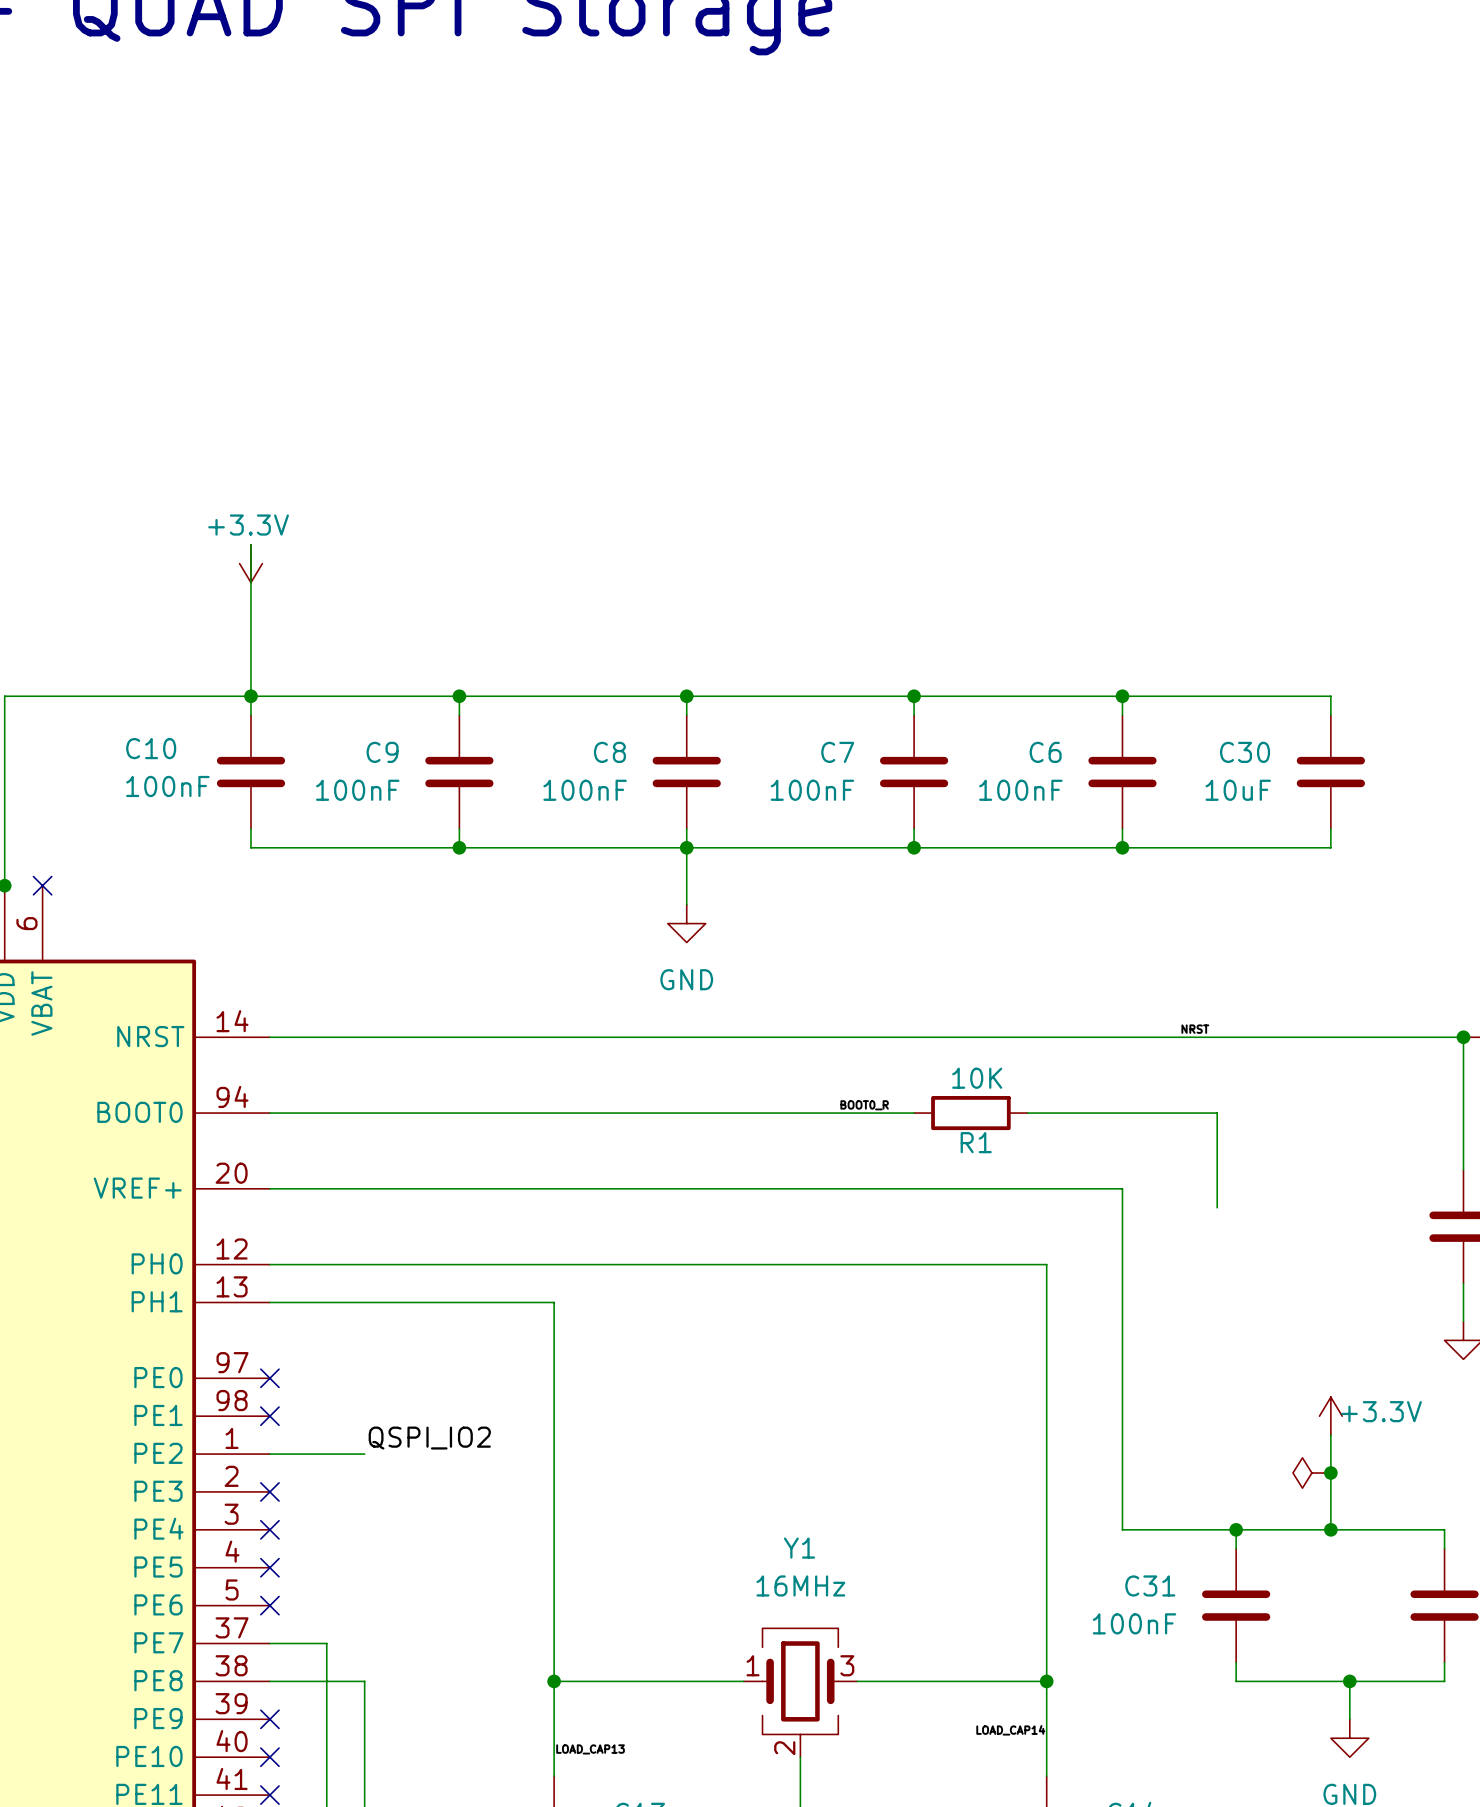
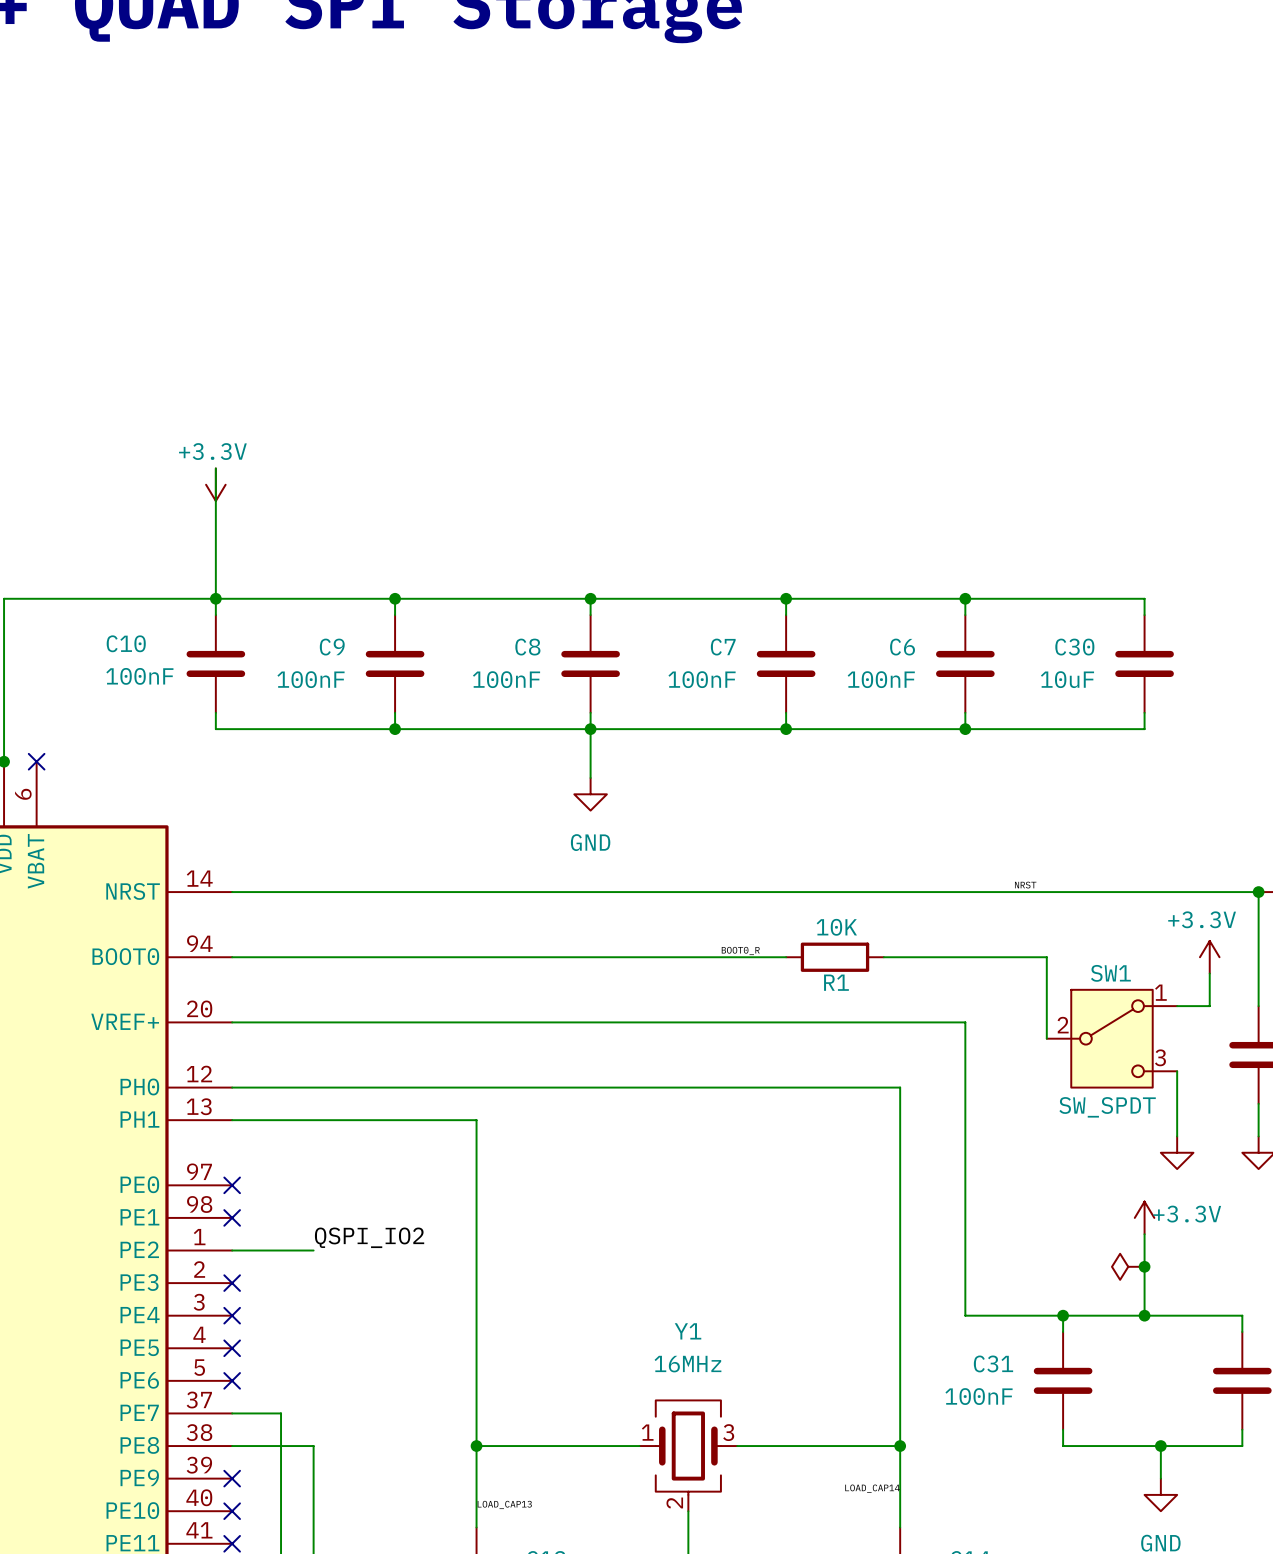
power symbol: none -> +3.3V (1209, 957)
wire: none -> (1209, 973) (1209, 1006) (1177, 1006)
SW1: none -> SW_SPDT (1111, 1038)
wire: none -> (1177, 1071) (1177, 1136)
power symbol: none -> (1177, 1152)

